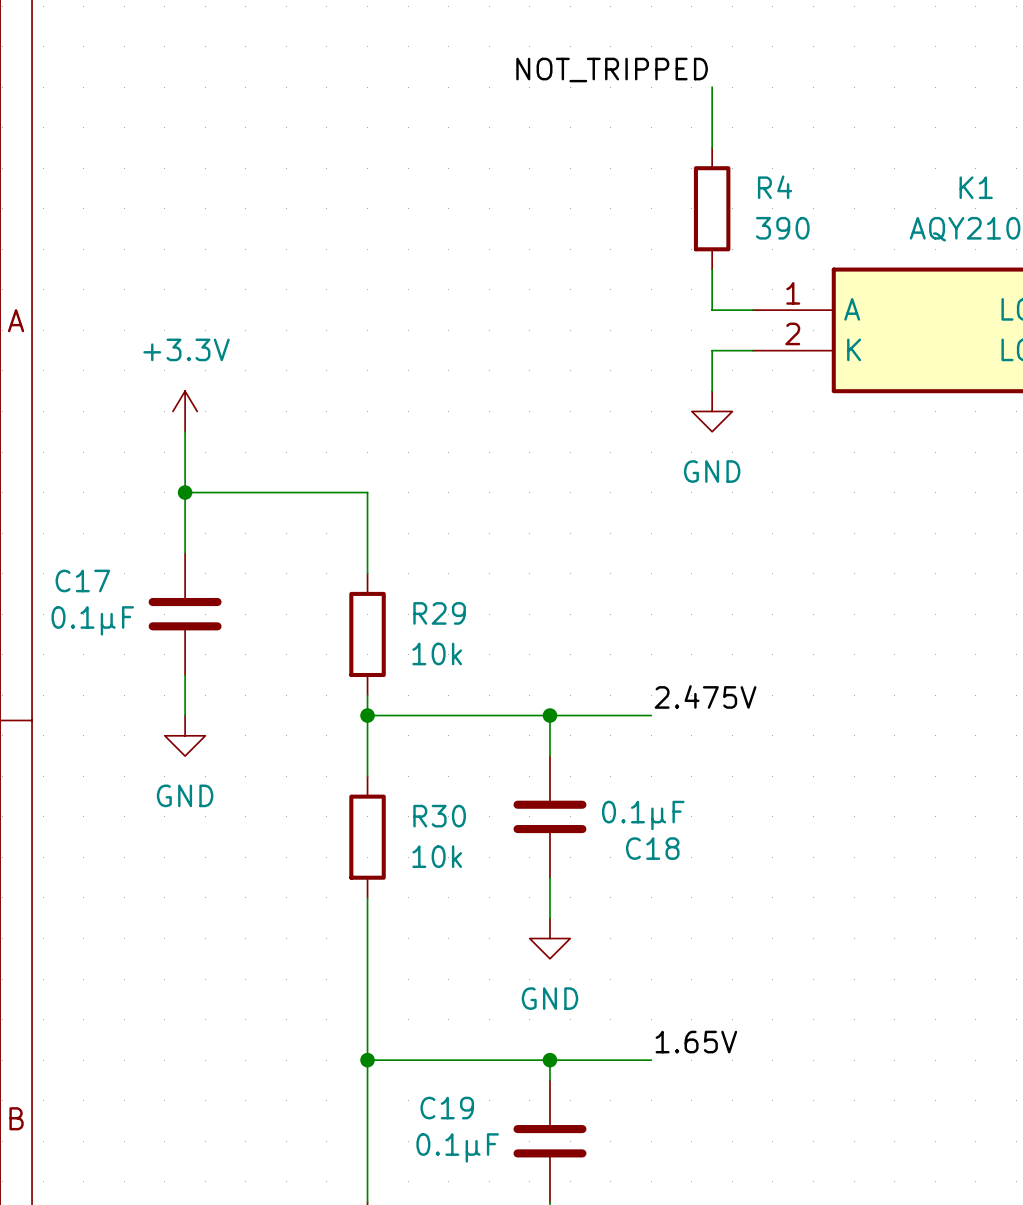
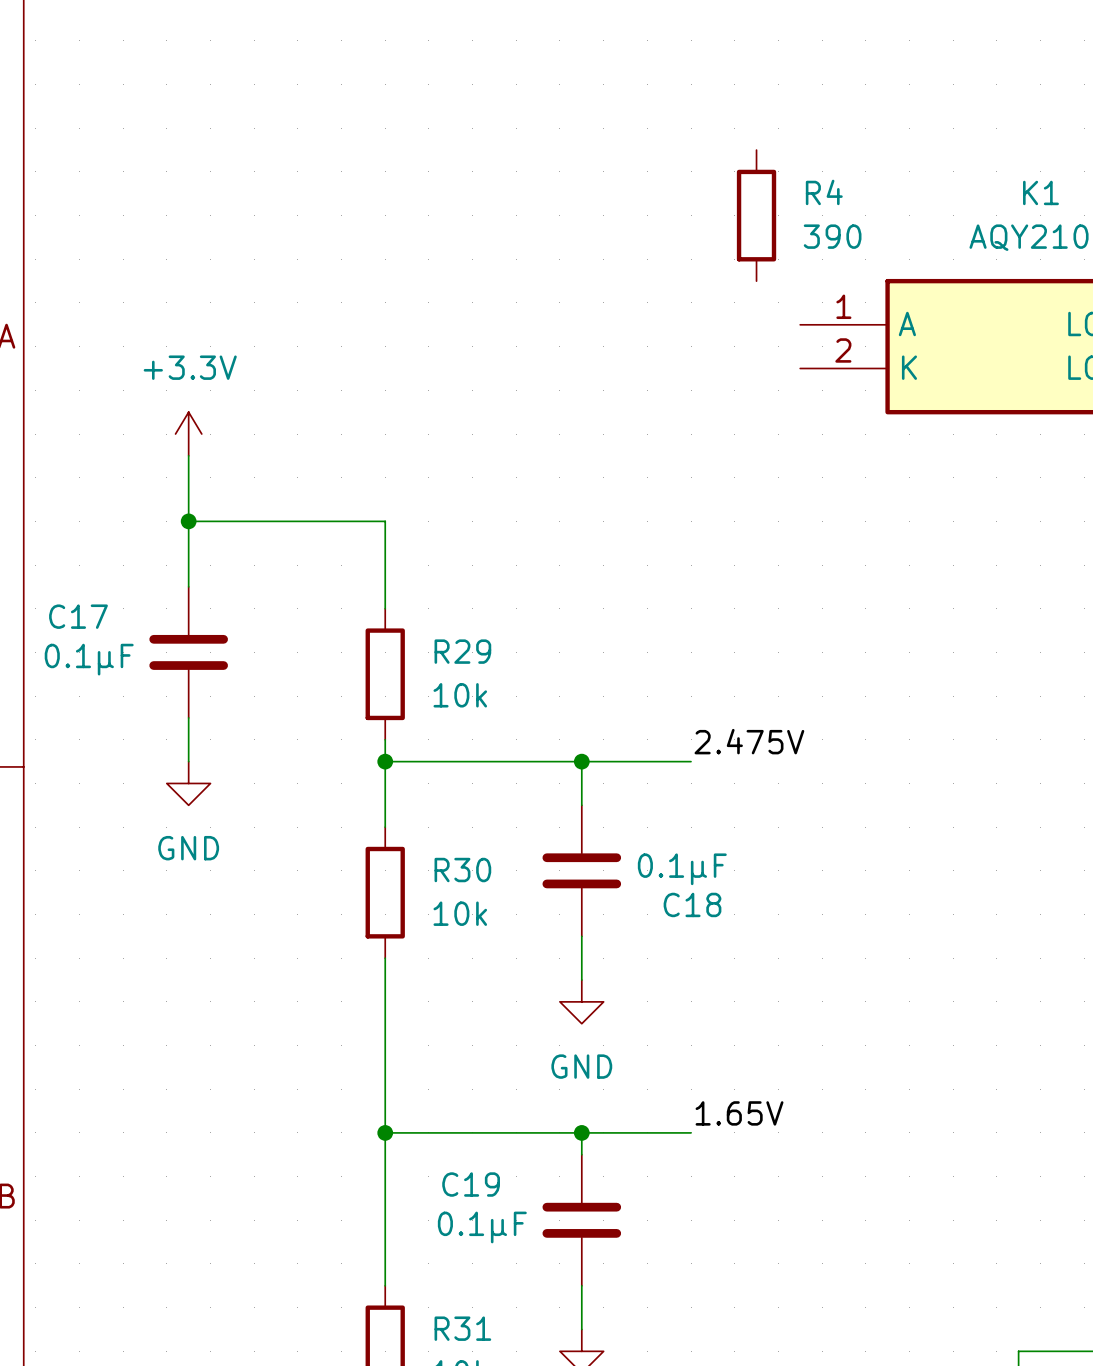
label: NOT_TRIPPED (612, 70) -> none
wire: (712, 87) (712, 147) -> none
wire: (712, 269) (712, 310) (752, 310) -> none
wire: (752, 350) (712, 350) (712, 391) -> none
power symbol: GND (712, 411) -> none

